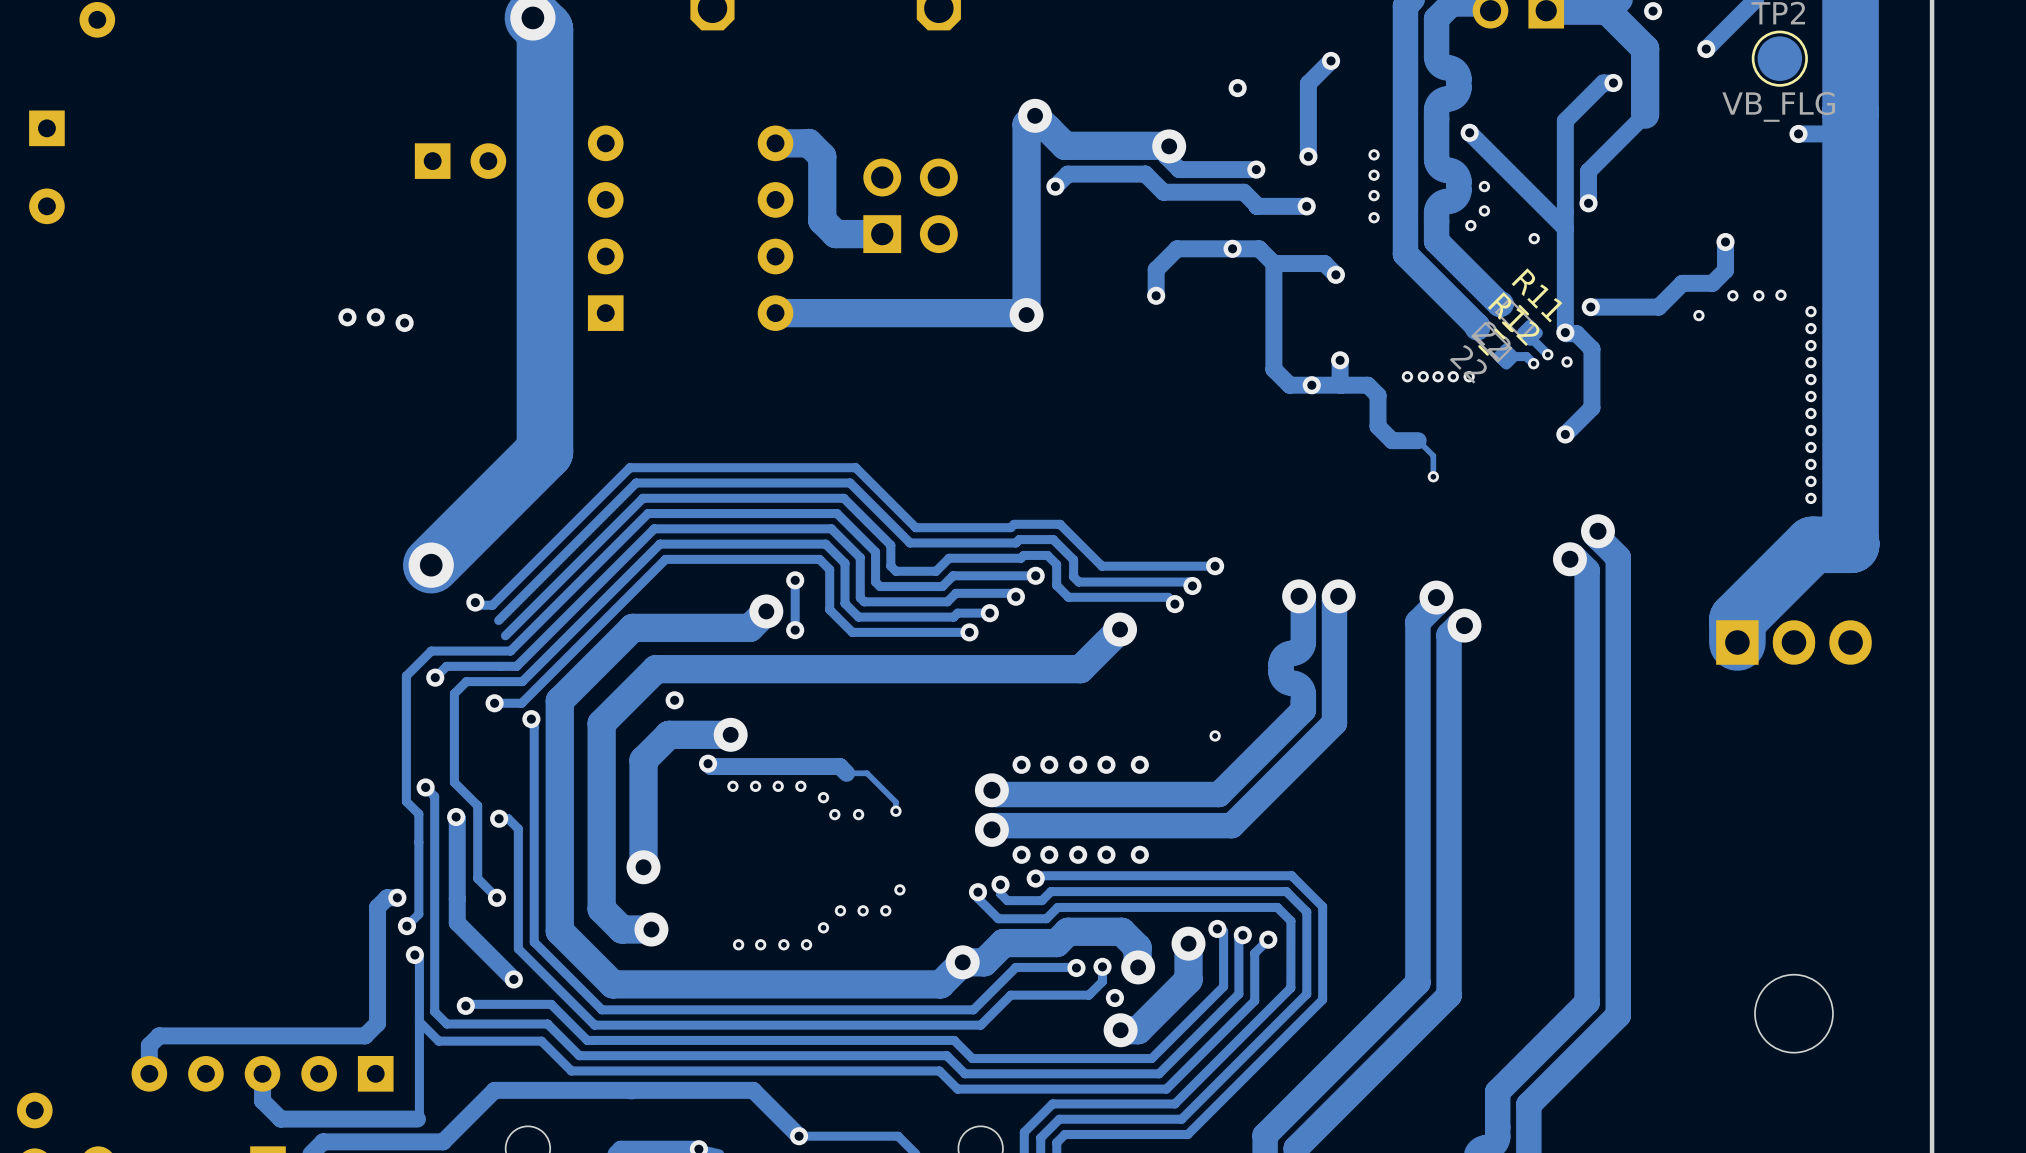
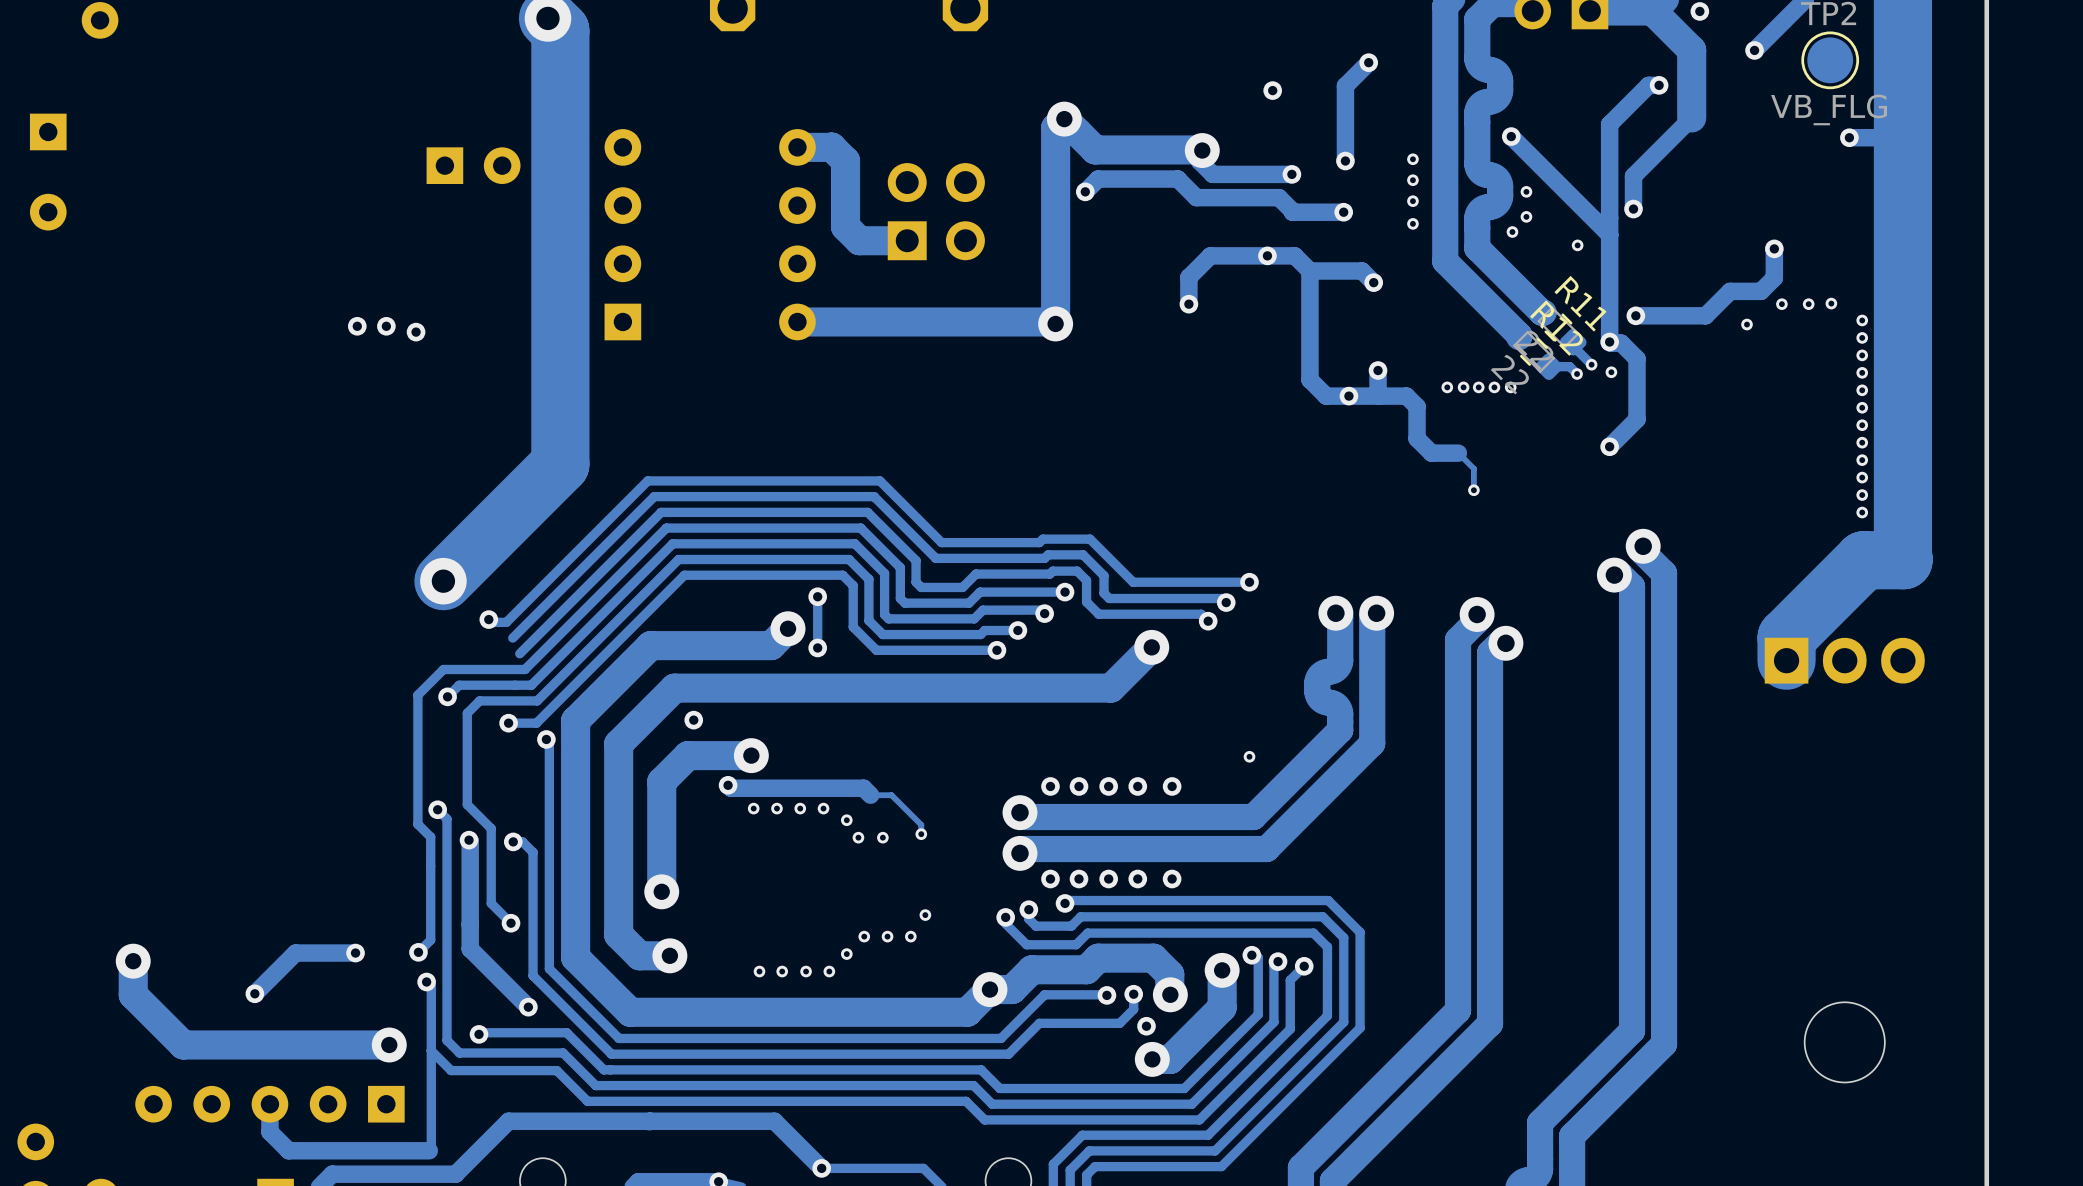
track: (397, 897) (387, 897) (377, 907) (377, 1023) (365, 1035) (159, 1035) (149, 1045) (149, 1073) -> none
via position: (397, 897) -> (355, 953)
track: none -> (355, 953) (295, 953) (254, 993)
track: none -> (133, 961) (133, 994) (183, 1044) (389, 1044)
via: none -> (133, 961)
via: none -> (254, 993)
via: none -> (389, 1044)

